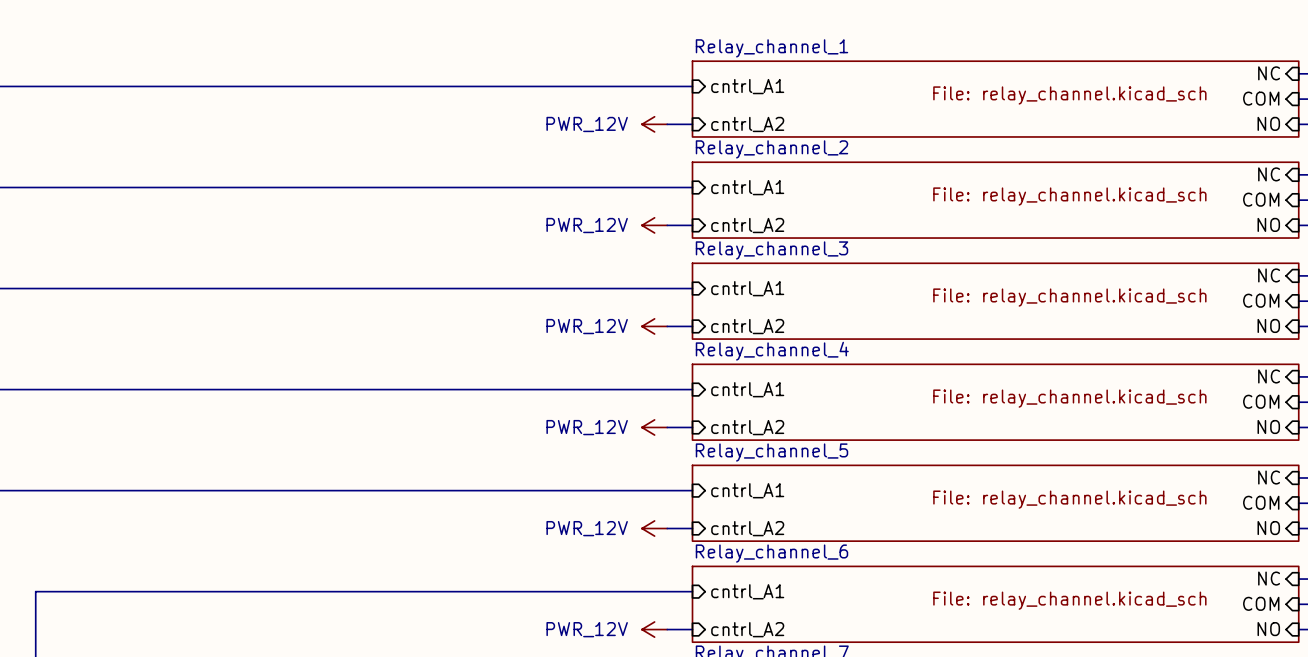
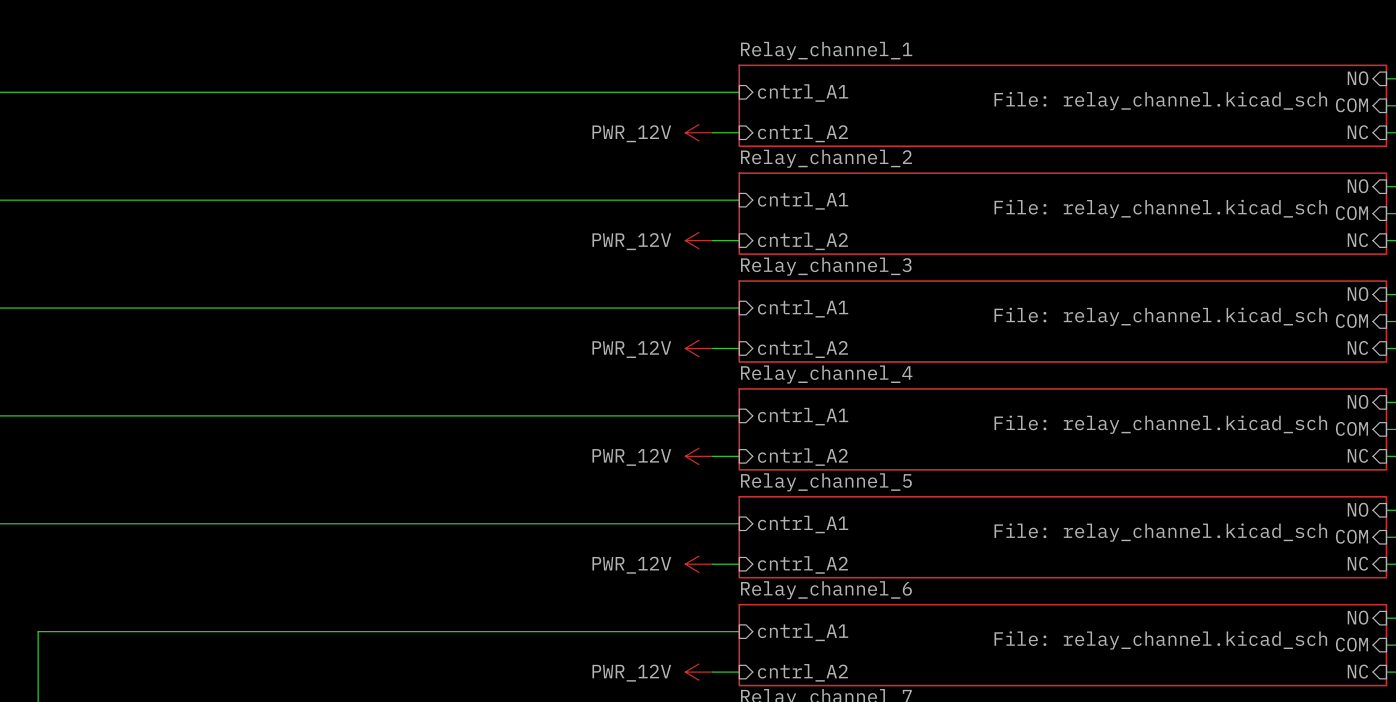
sheet pin: NC (1269, 73) -> NO (1358, 78)
sheet pin: NO (1268, 123) -> NC (1357, 132)
sheet pin: NC (1269, 174) -> NO (1358, 186)
sheet pin: NO (1268, 224) -> NC (1357, 240)
sheet pin: NC (1269, 275) -> NO (1358, 294)
sheet pin: NO (1268, 325) -> NC (1357, 347)
sheet pin: NC (1269, 376) -> NO (1358, 401)
sheet pin: NO (1268, 427) -> NC (1357, 455)
sheet pin: NC (1269, 477) -> NO (1358, 509)
sheet pin: NO (1268, 528) -> NC (1357, 563)
sheet pin: NC (1269, 578) -> NO (1358, 617)
sheet pin: NO (1268, 629) -> NC (1357, 671)

